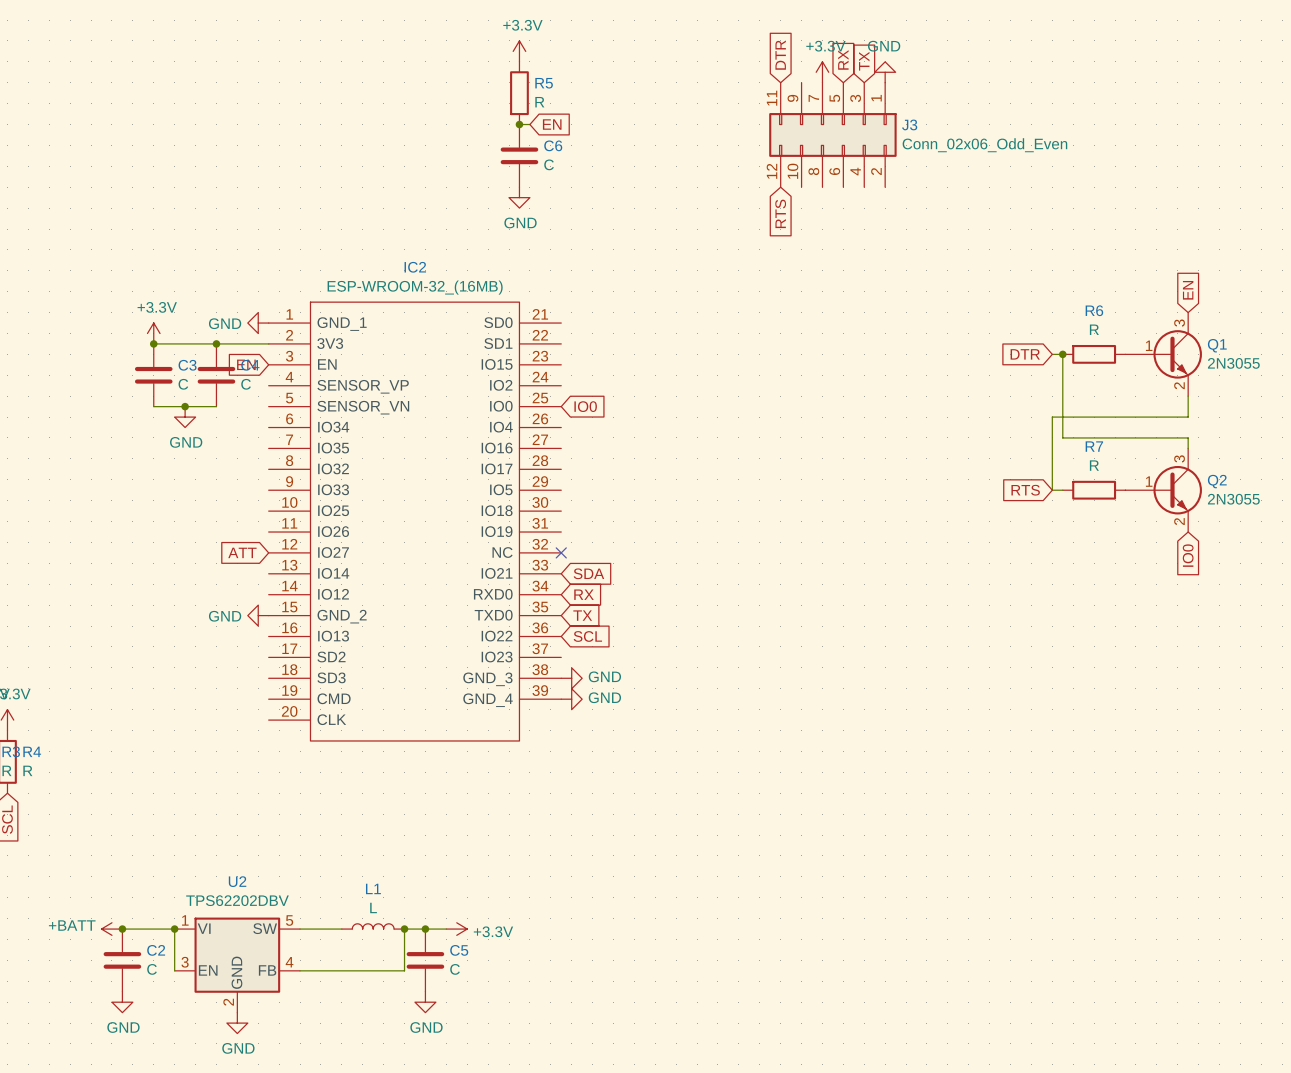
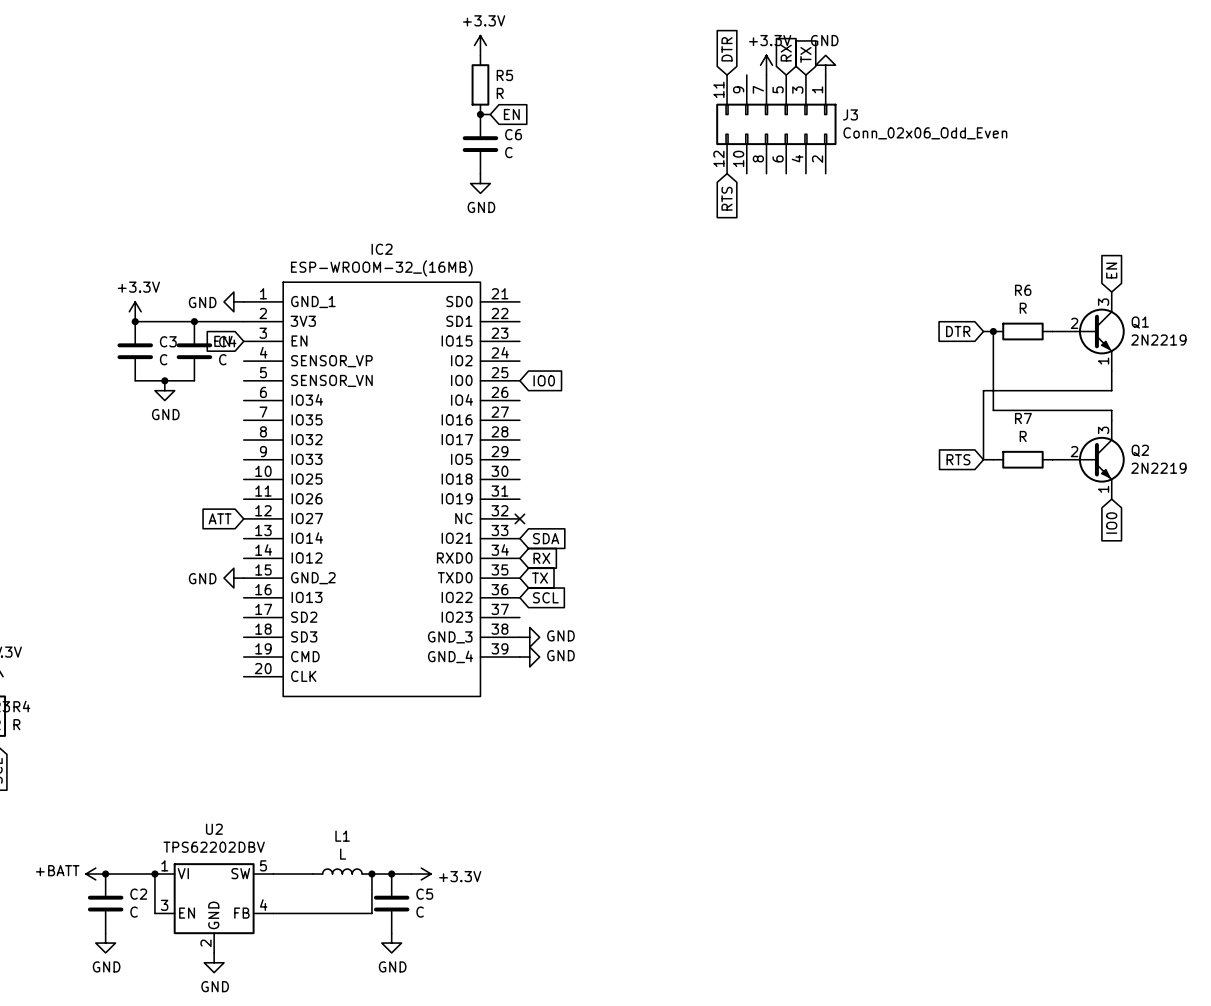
Q1 pin number: 1 (1149, 345) -> 2 (1074, 323)
Q1 value: 2N3055 (1233, 363) -> 2N2219 (1158, 340)
Q1 pin number: 2 (1179, 385) -> 1 (1103, 361)
Q2 pin number: 1 (1149, 481) -> 2 (1074, 451)
Q2 value: 2N3055 (1233, 499) -> 2N2219 (1158, 468)
Q2 pin number: 2 (1179, 521) -> 1 (1103, 489)

